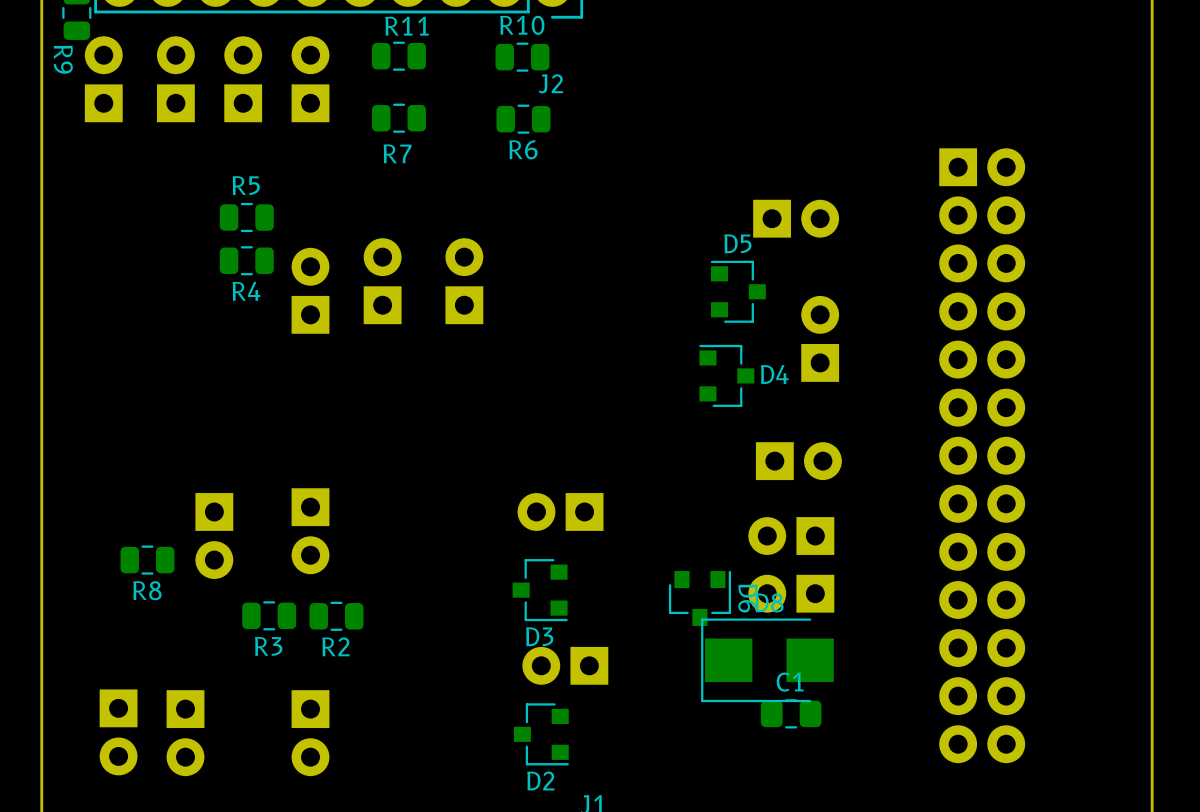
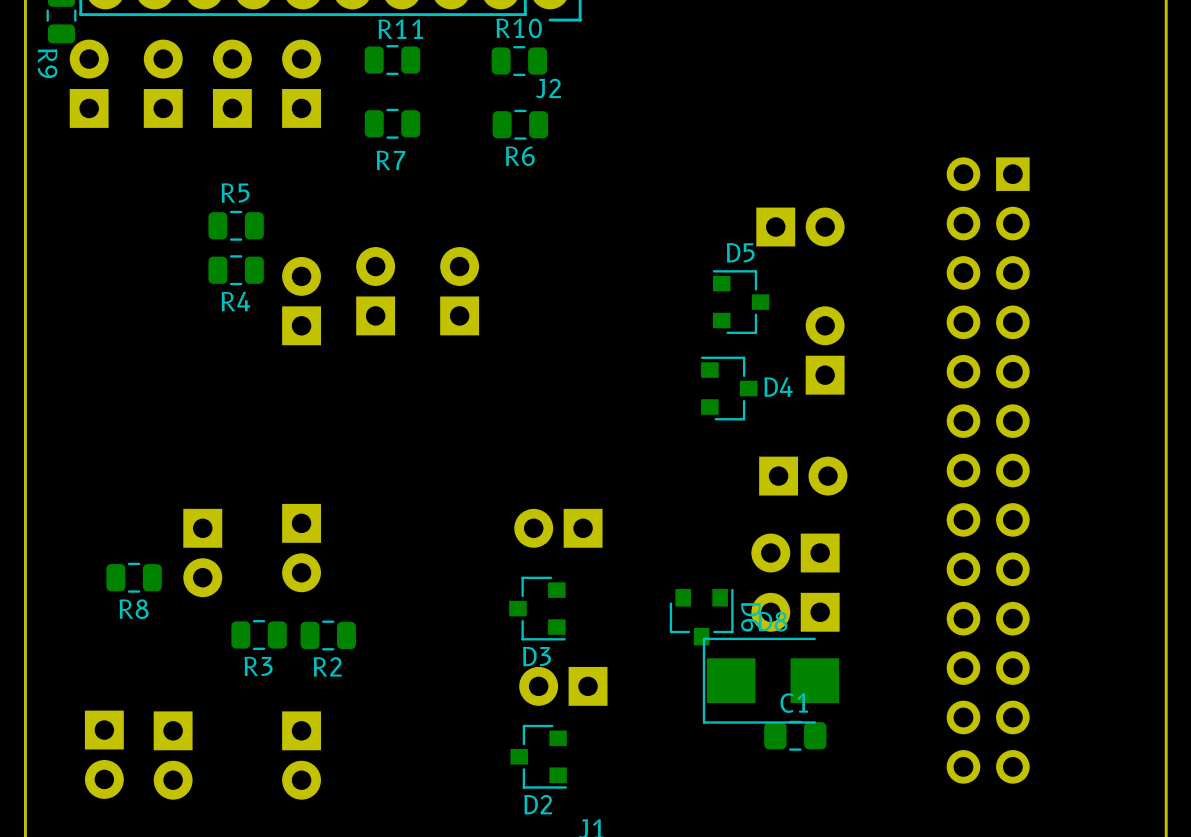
part footprint: [939, 148, 1026, 764] -> [946, 157, 1030, 784]

